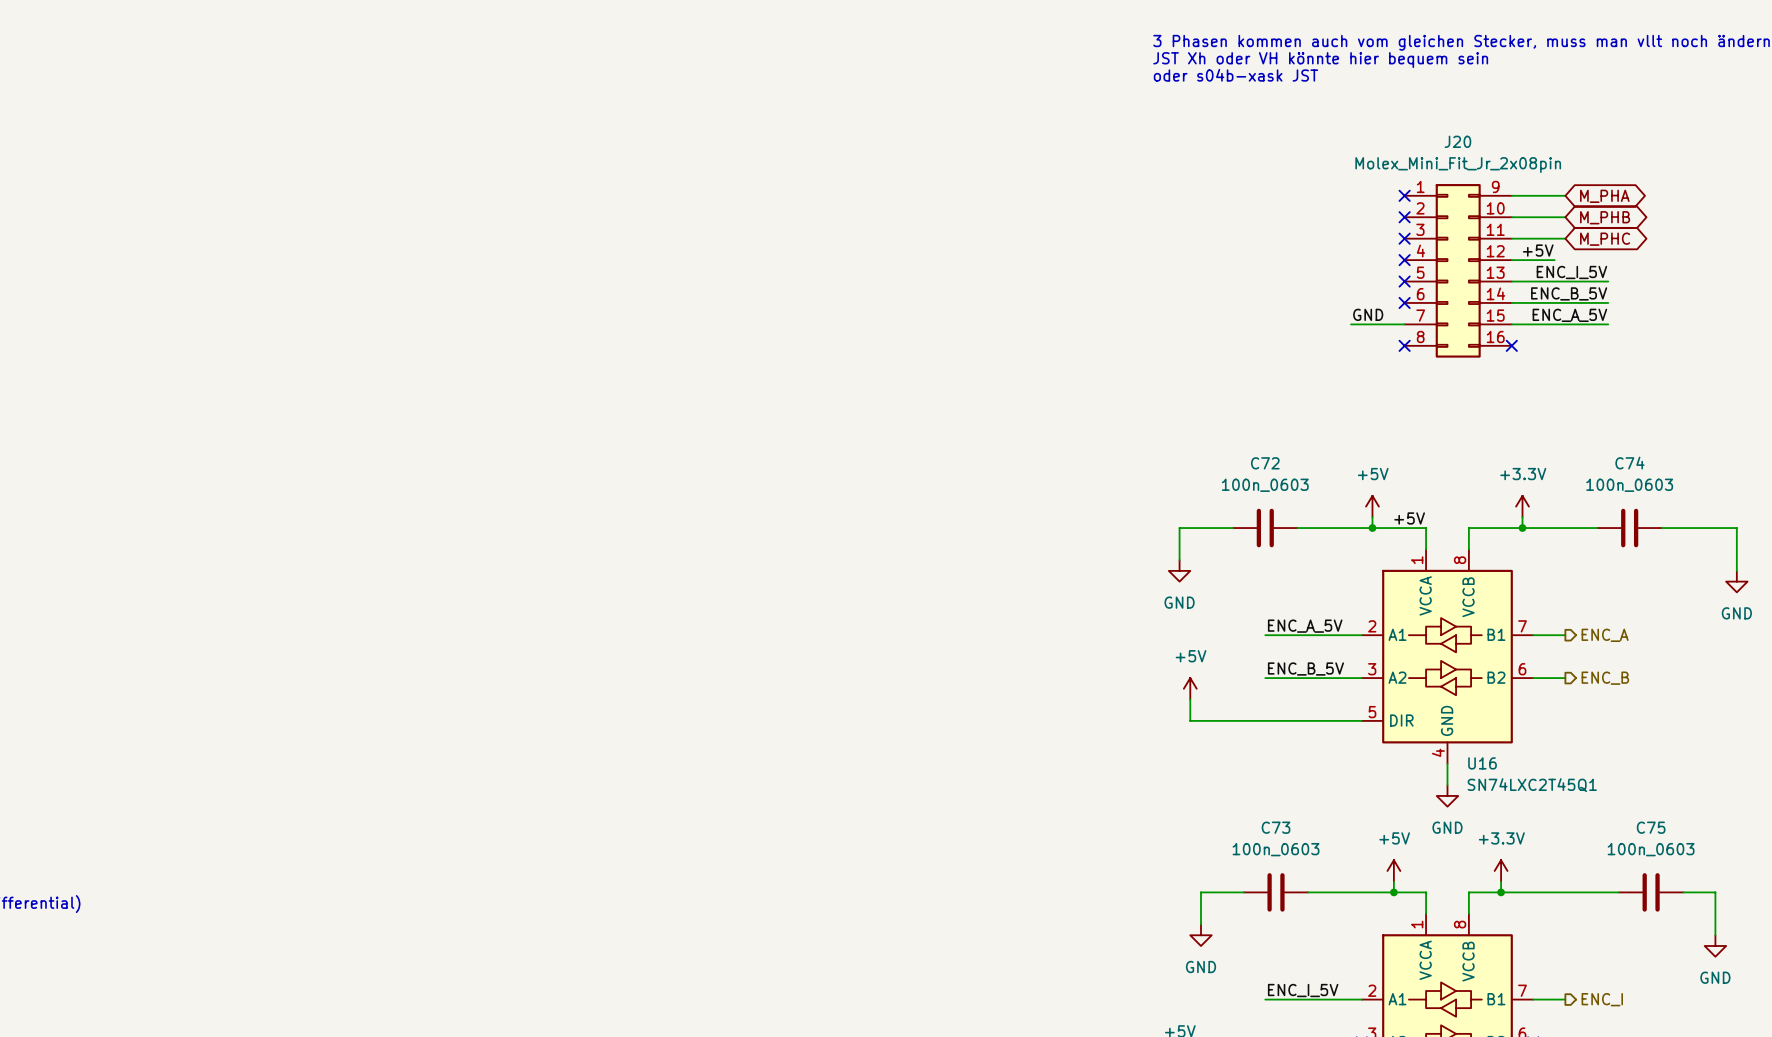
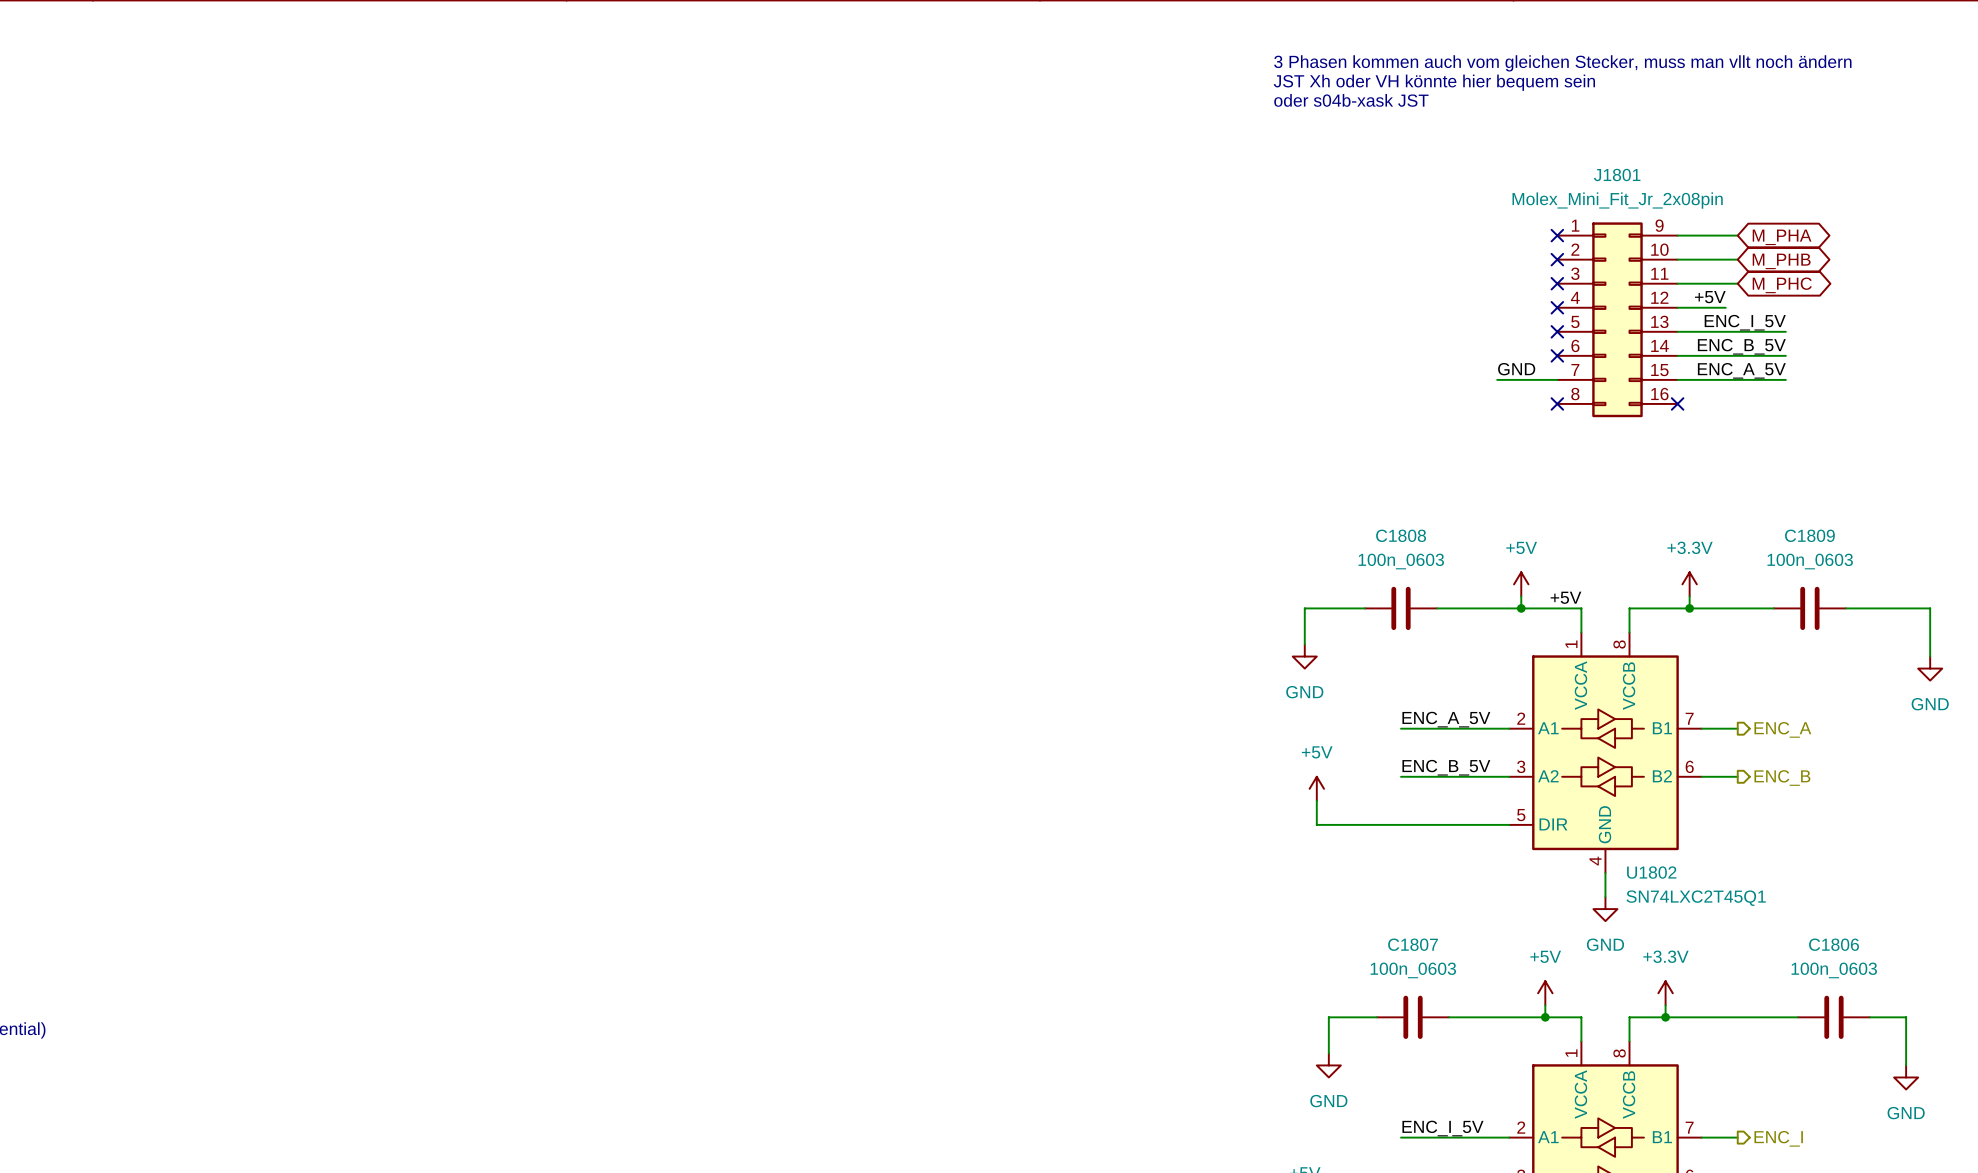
J20 name: J20 (1457, 141) -> J1801 (1617, 175)
C72 name: C72 (1265, 463) -> C1808 (1401, 535)
C74 name: C74 (1629, 463) -> C1809 (1809, 535)
U16 name: U16 (1482, 763) -> U1802 (1651, 872)
C73 name: C73 (1276, 827) -> C1807 (1413, 944)
C75 name: C75 (1651, 827) -> C1806 (1834, 944)

